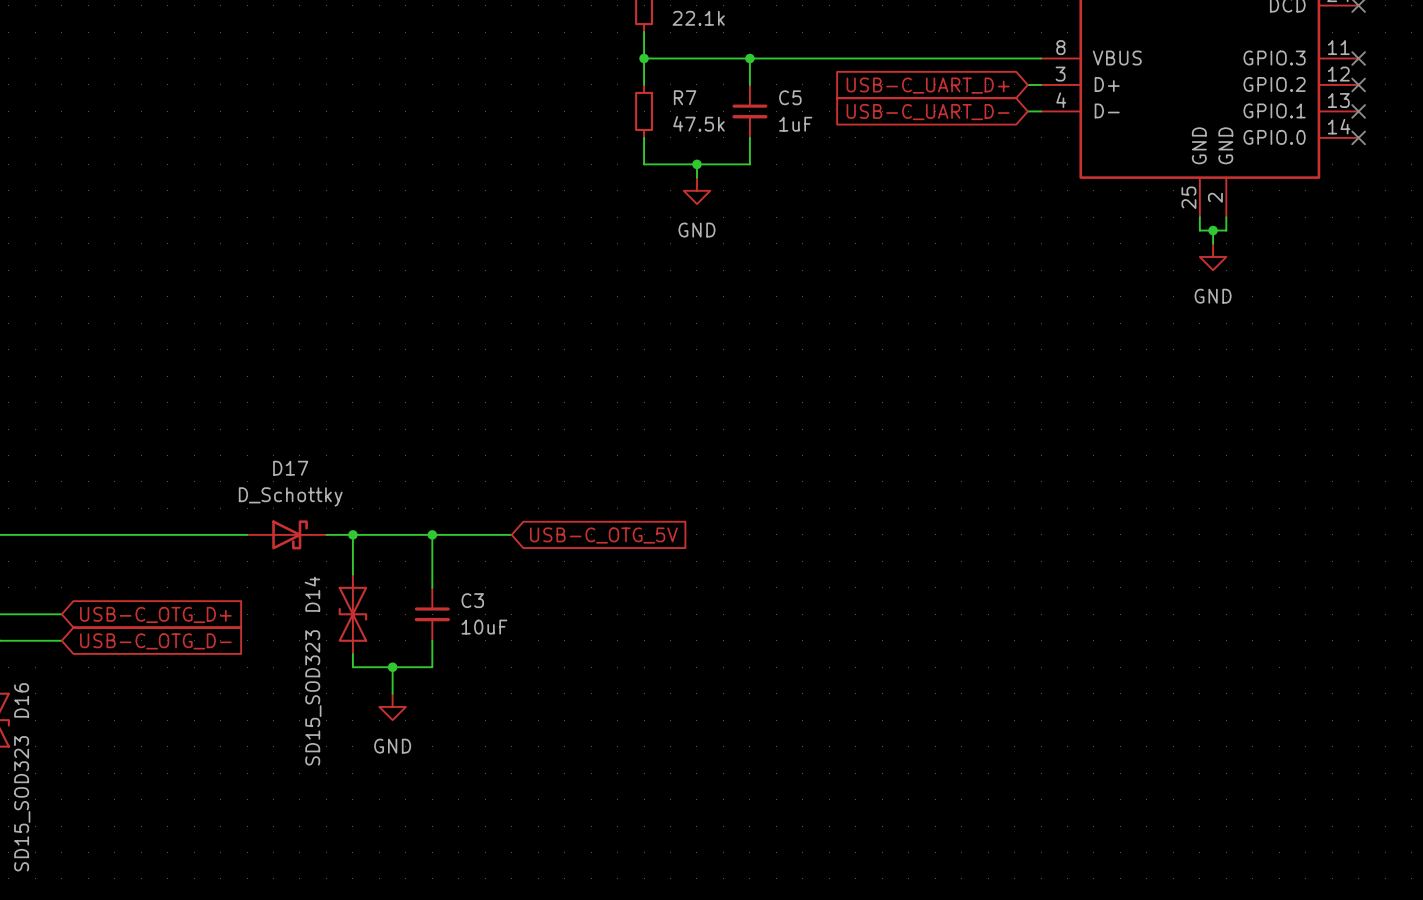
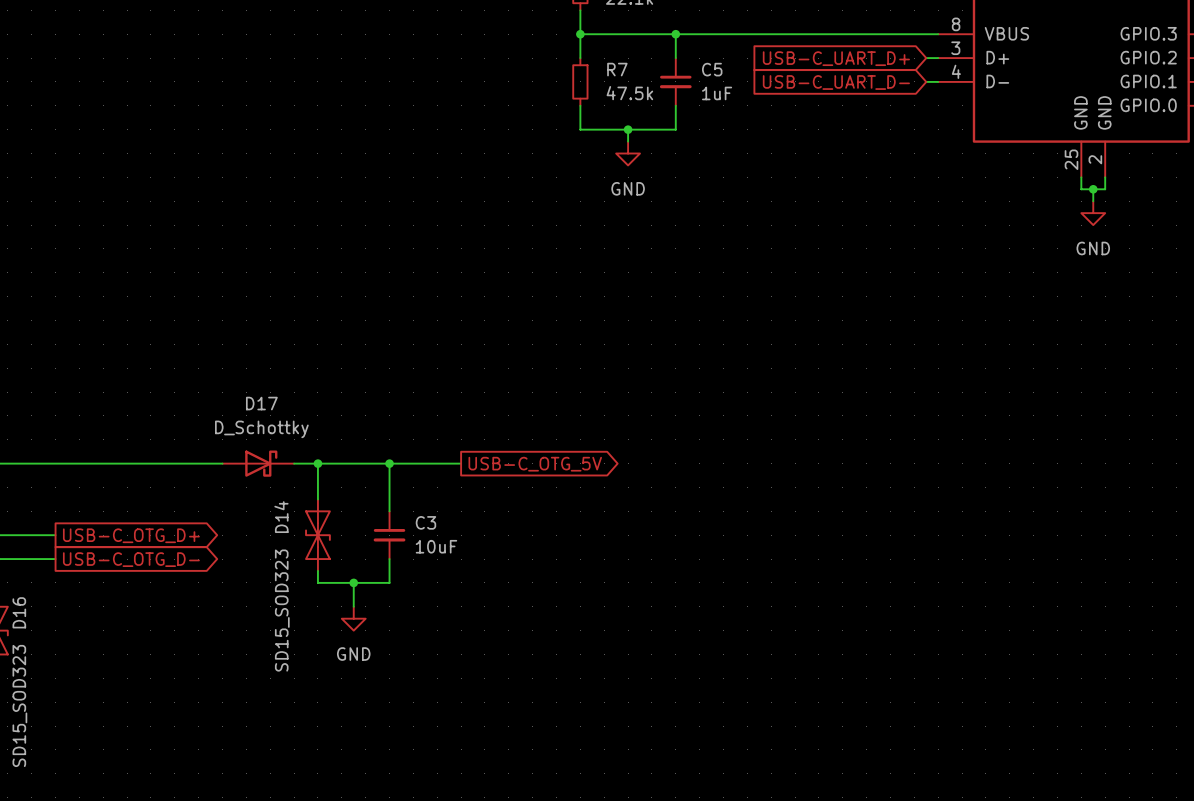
global label shape: input (603, 535) -> output (535, 464)
global label shape: input (155, 614) -> output (131, 535)
global label shape: input (155, 641) -> output (131, 559)

